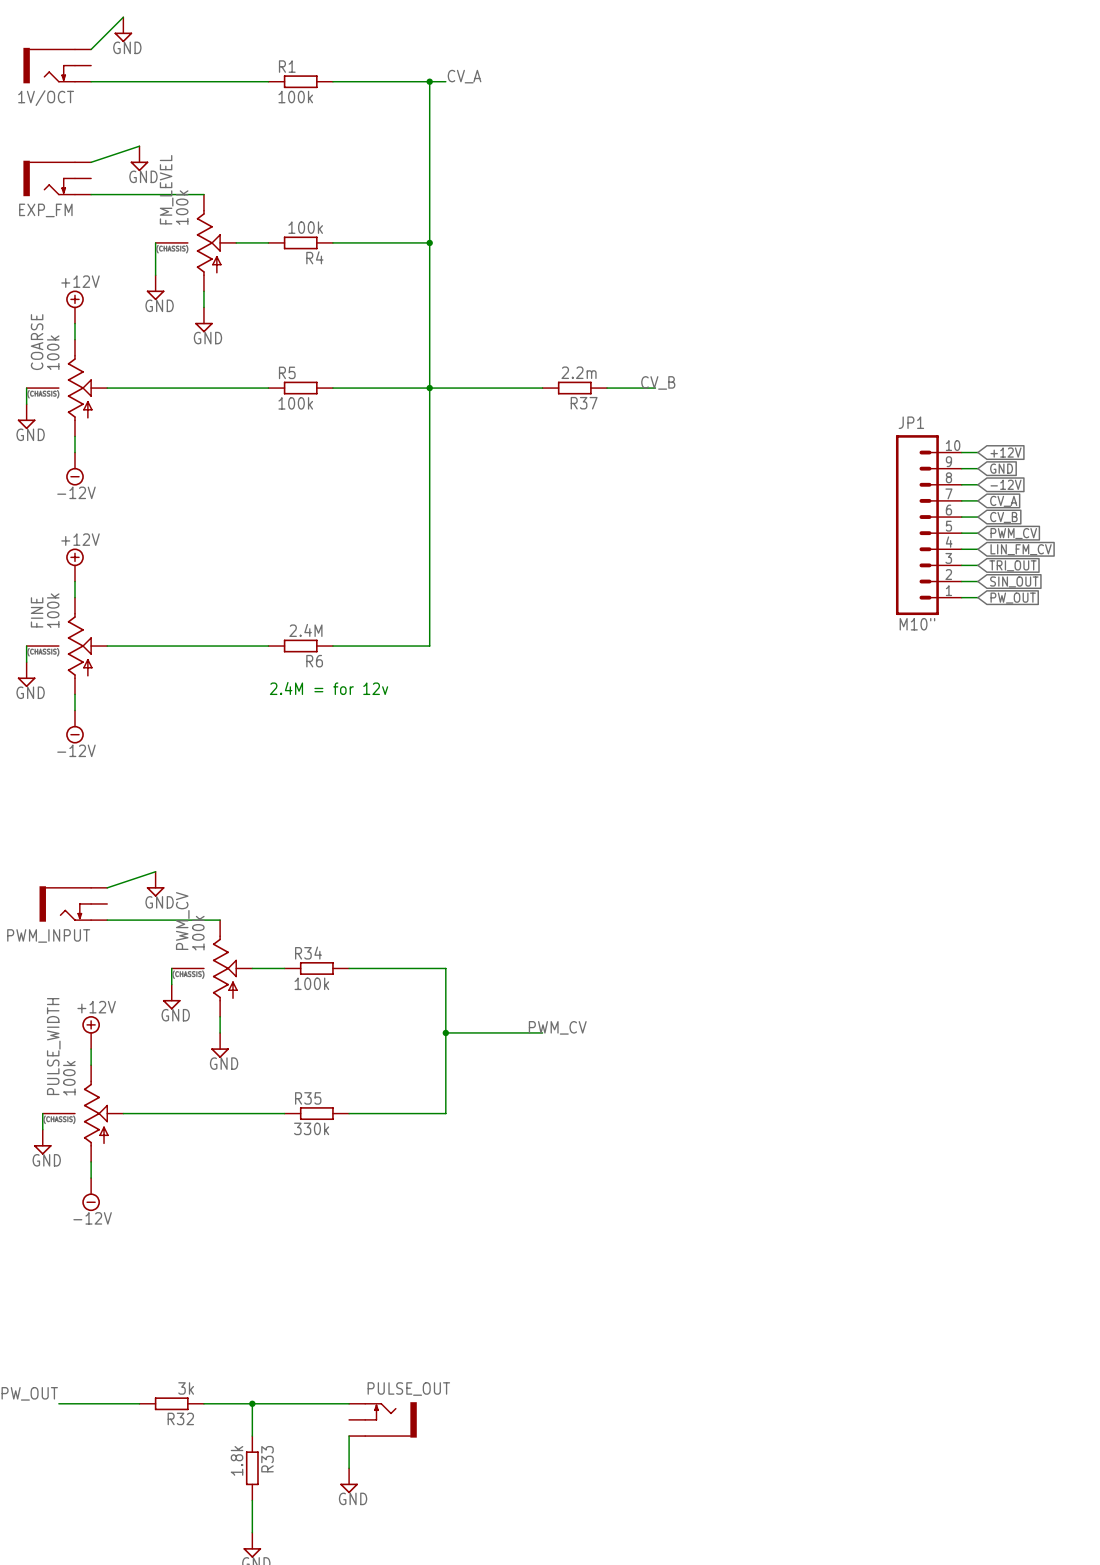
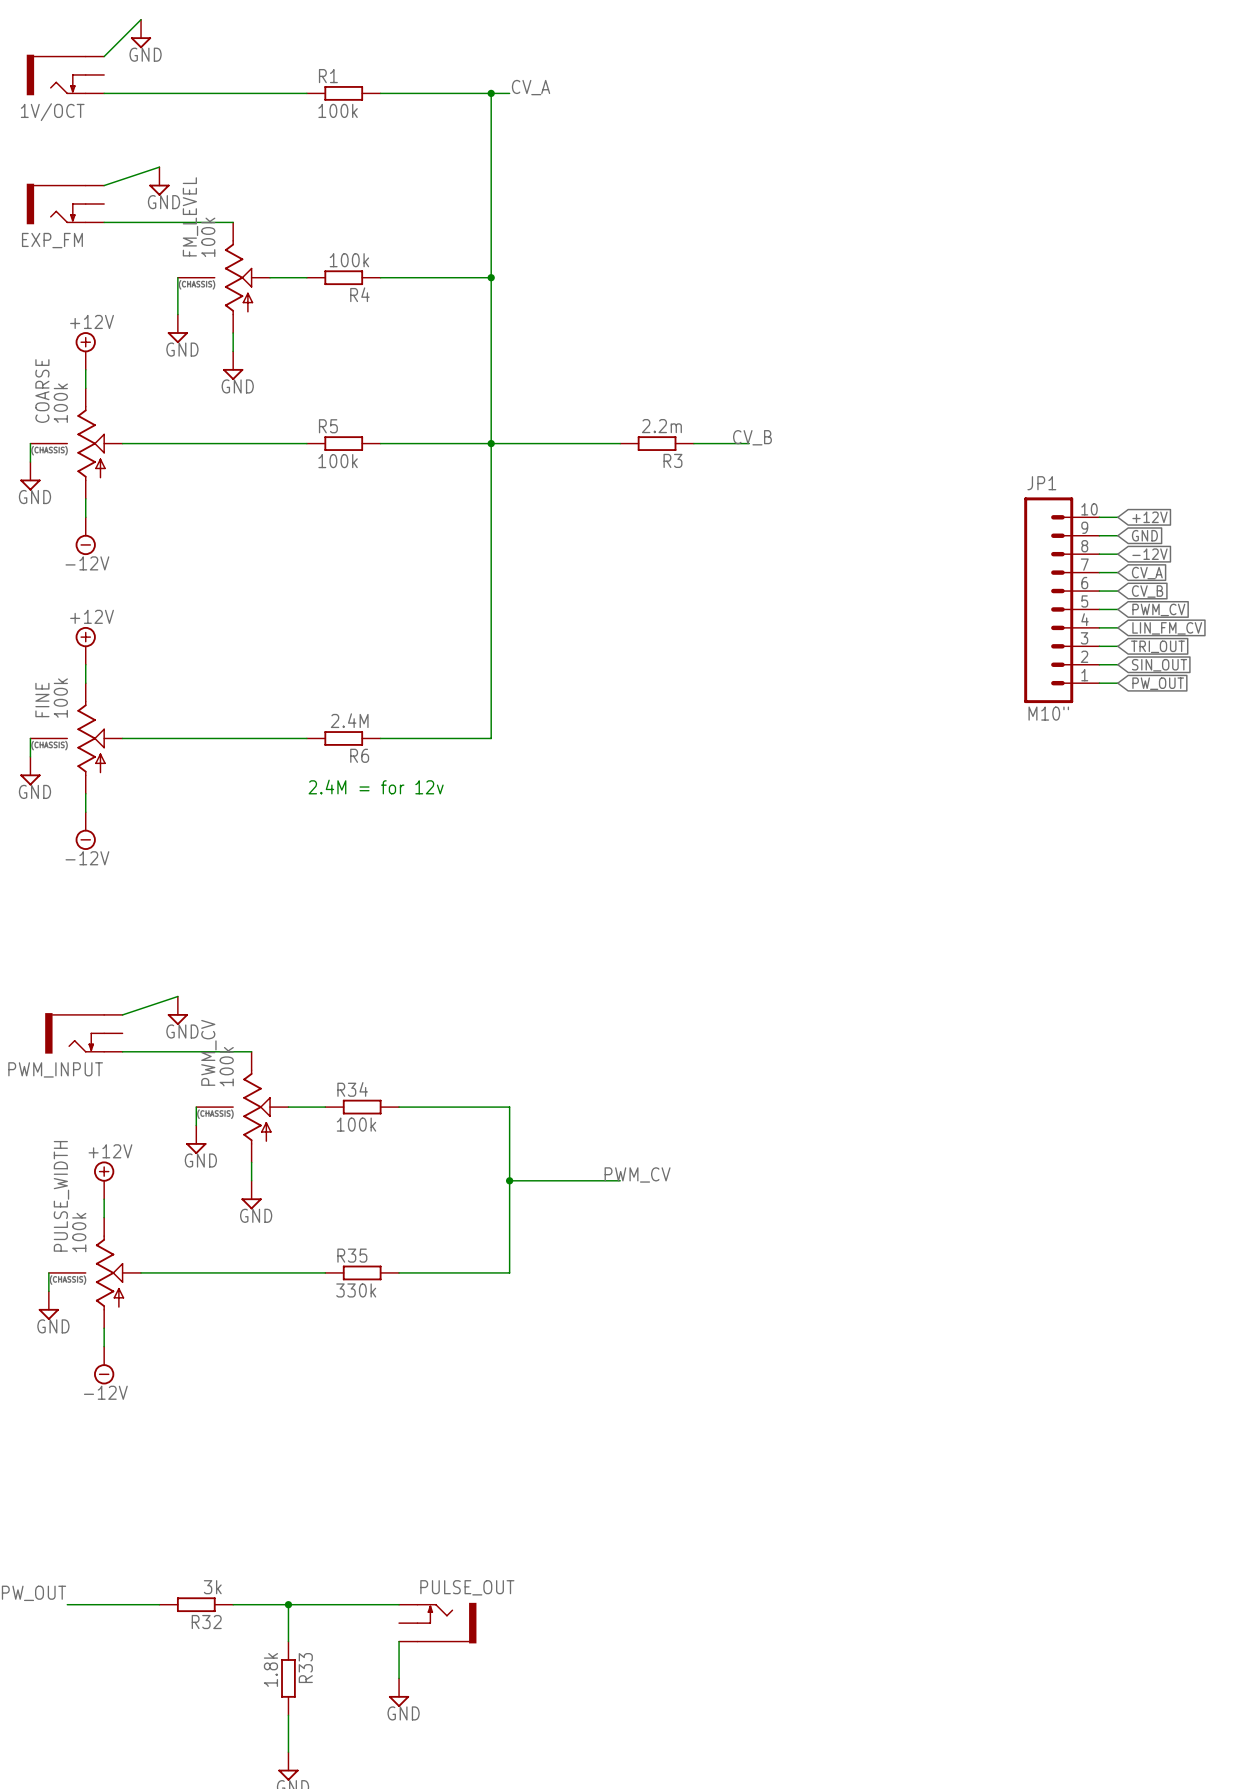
R37 name: R37 (584, 403) -> R3 (672, 460)

